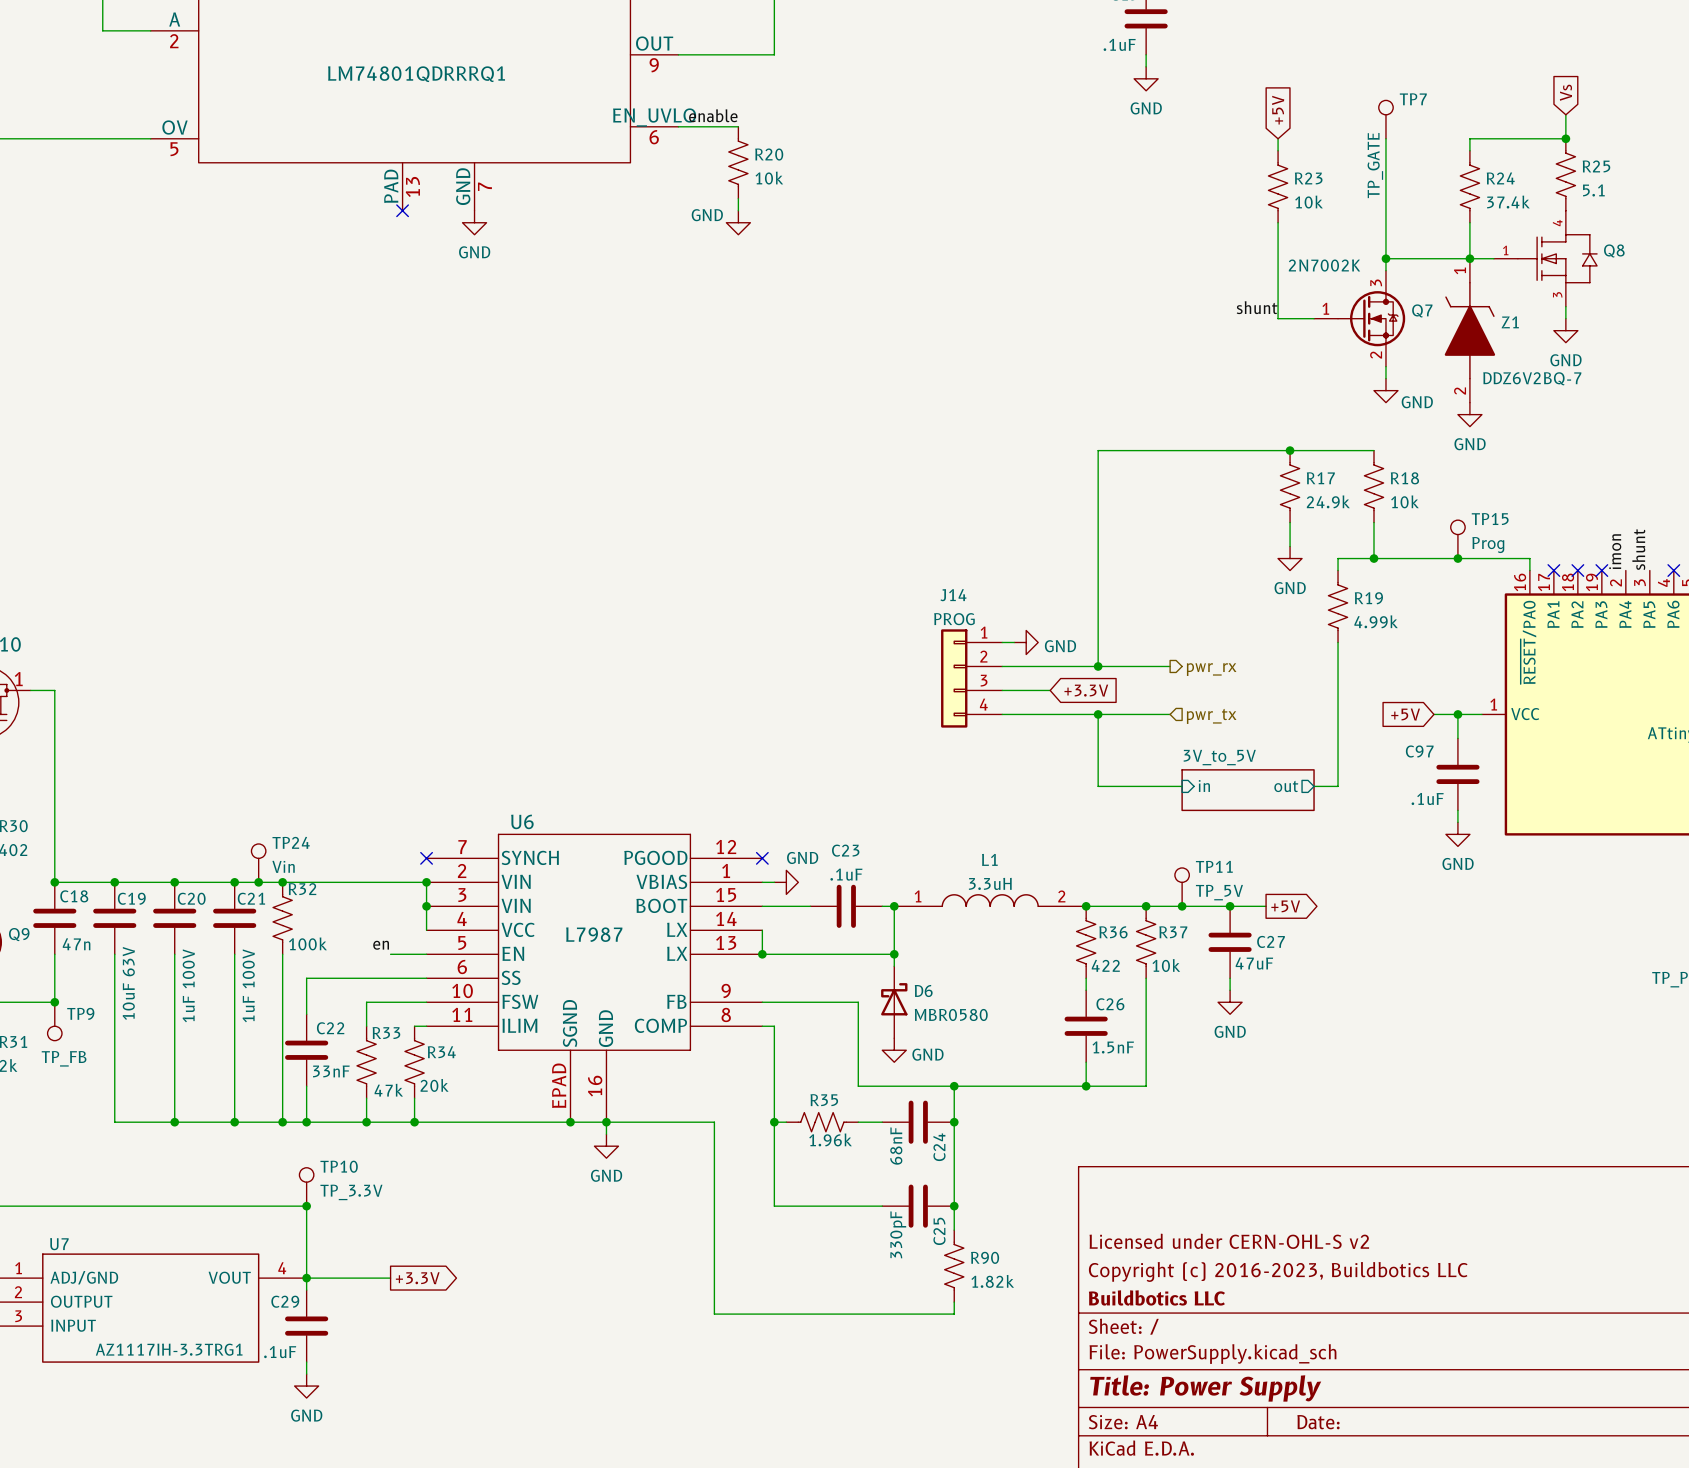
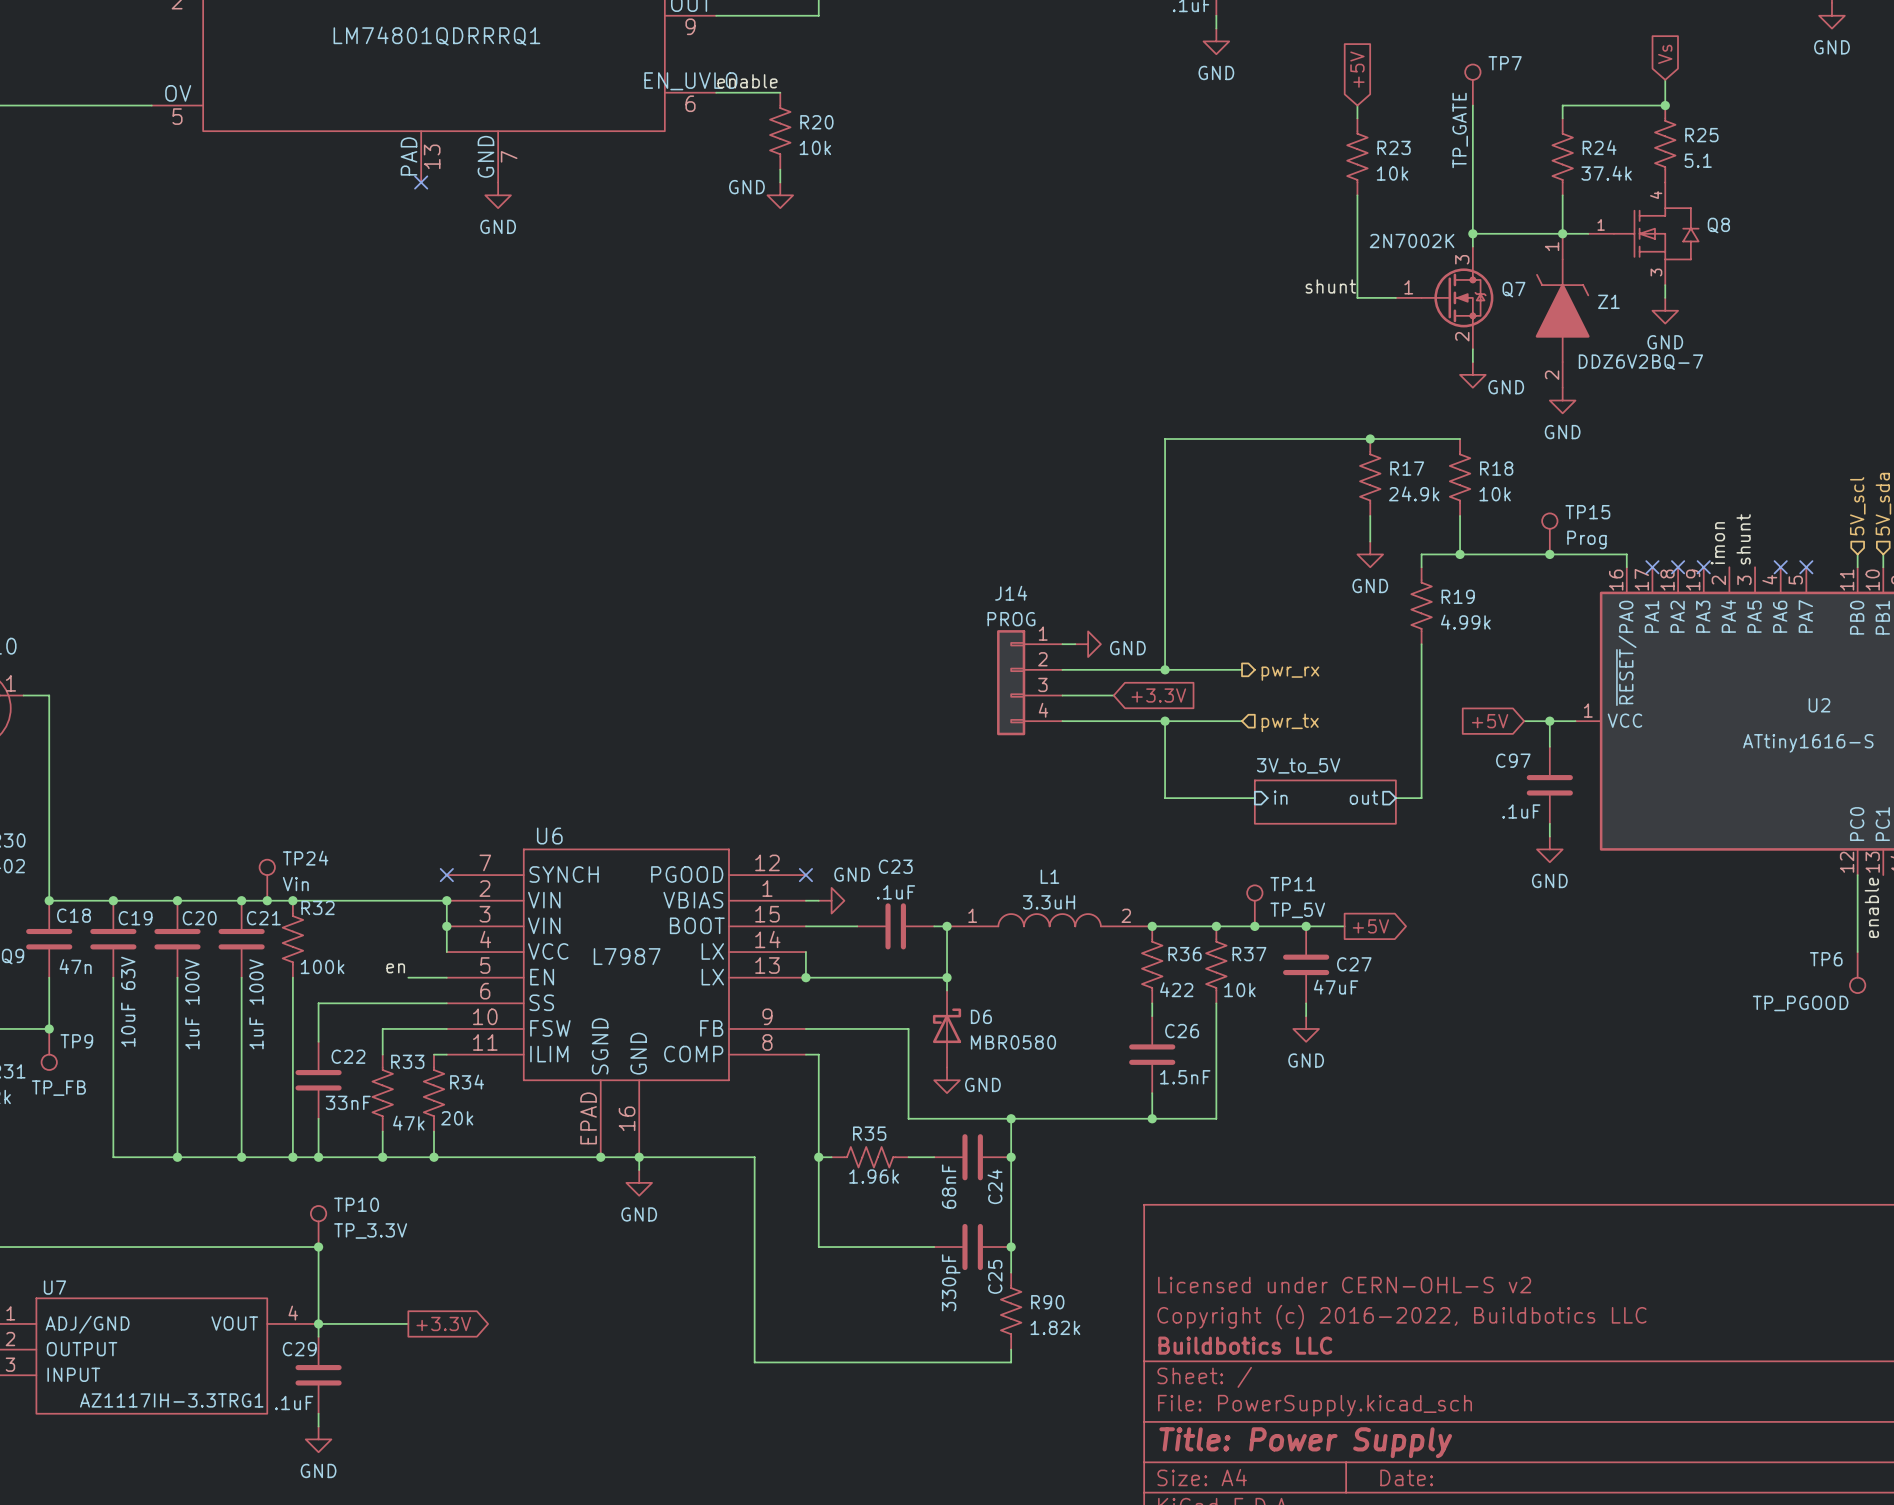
title block: Copyright (c) 2016-2023, Buildbotics LLC (1278, 1271) -> Copyright (c) 2016-2022, Buildbotics LLC (1401, 1317)

